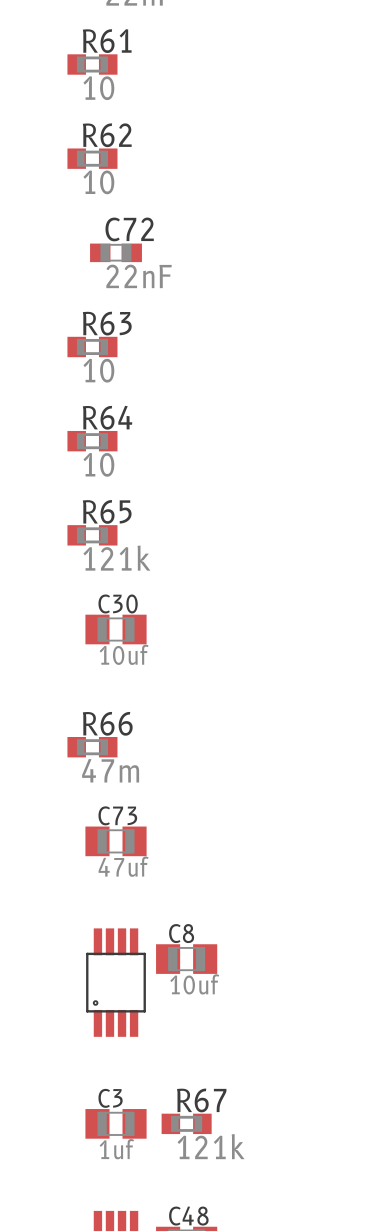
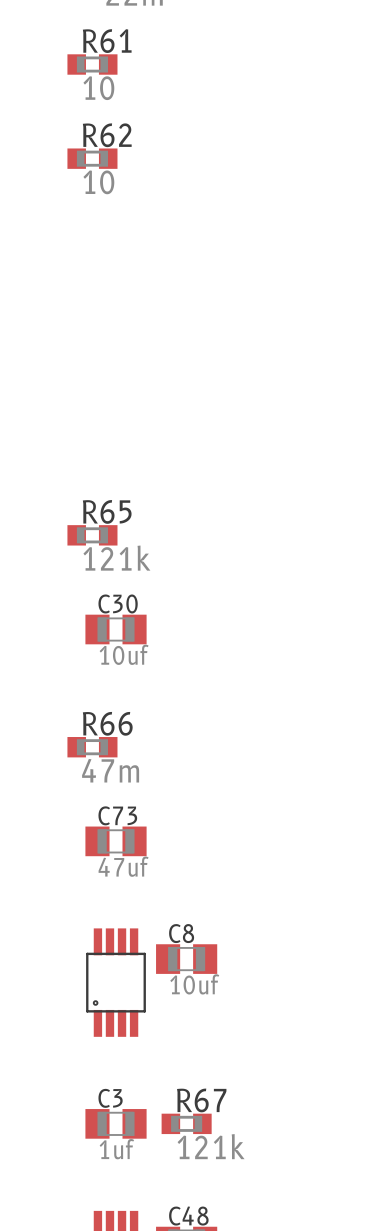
C72: 22nF (116, 252) -> none
R63: 10 (92, 347) -> none
R64: 10 (92, 441) -> none

